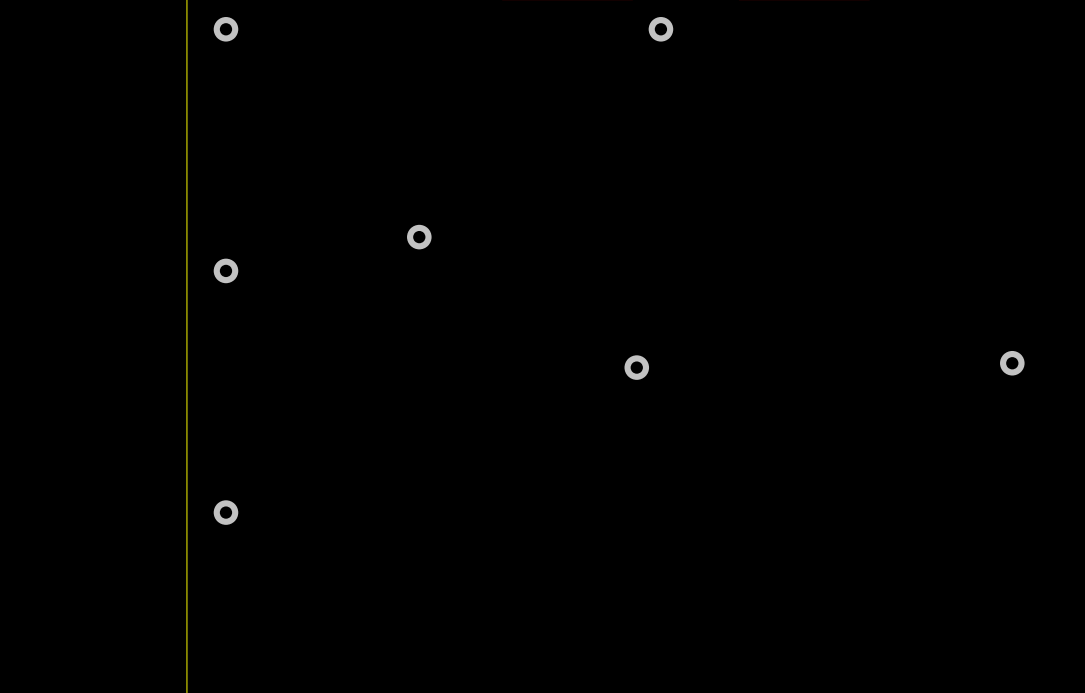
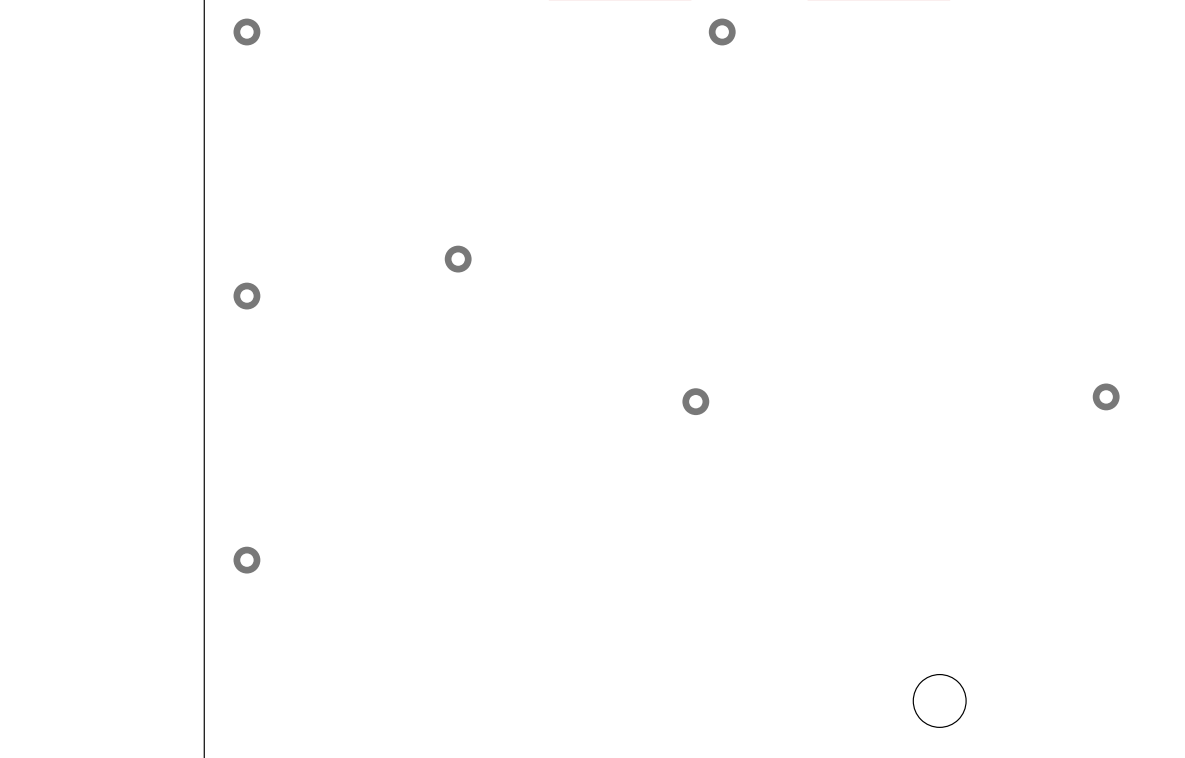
round board edge: none -> [913, 674, 967, 728]

